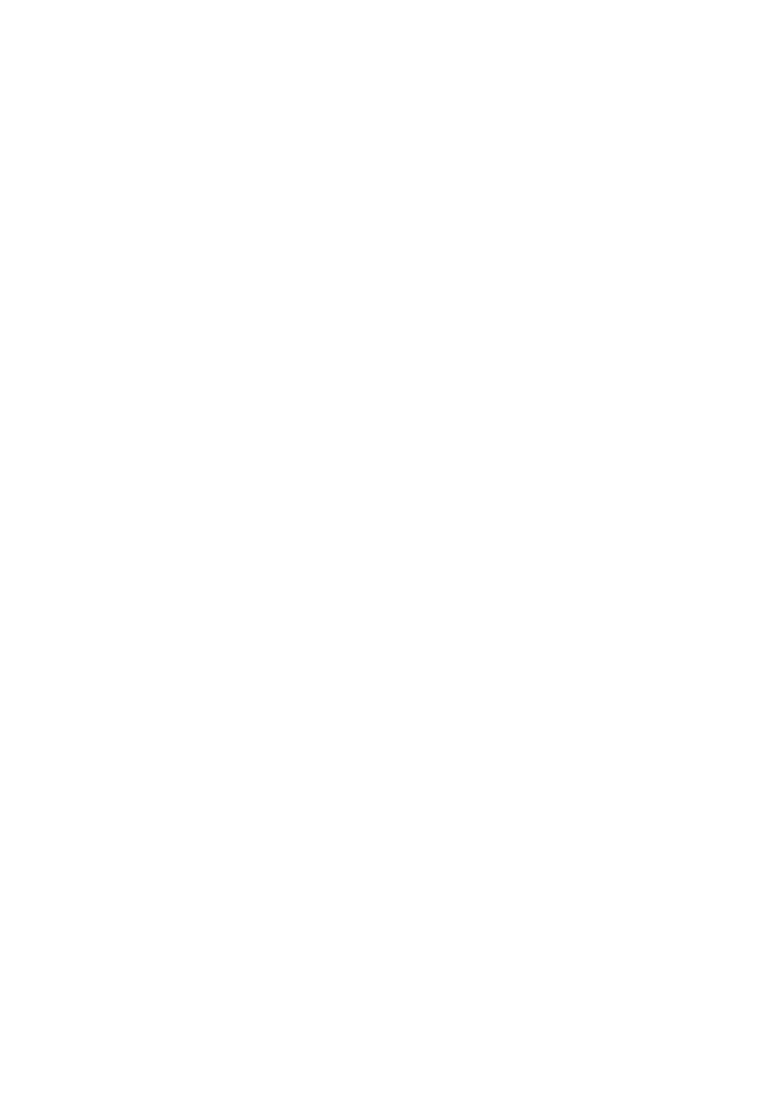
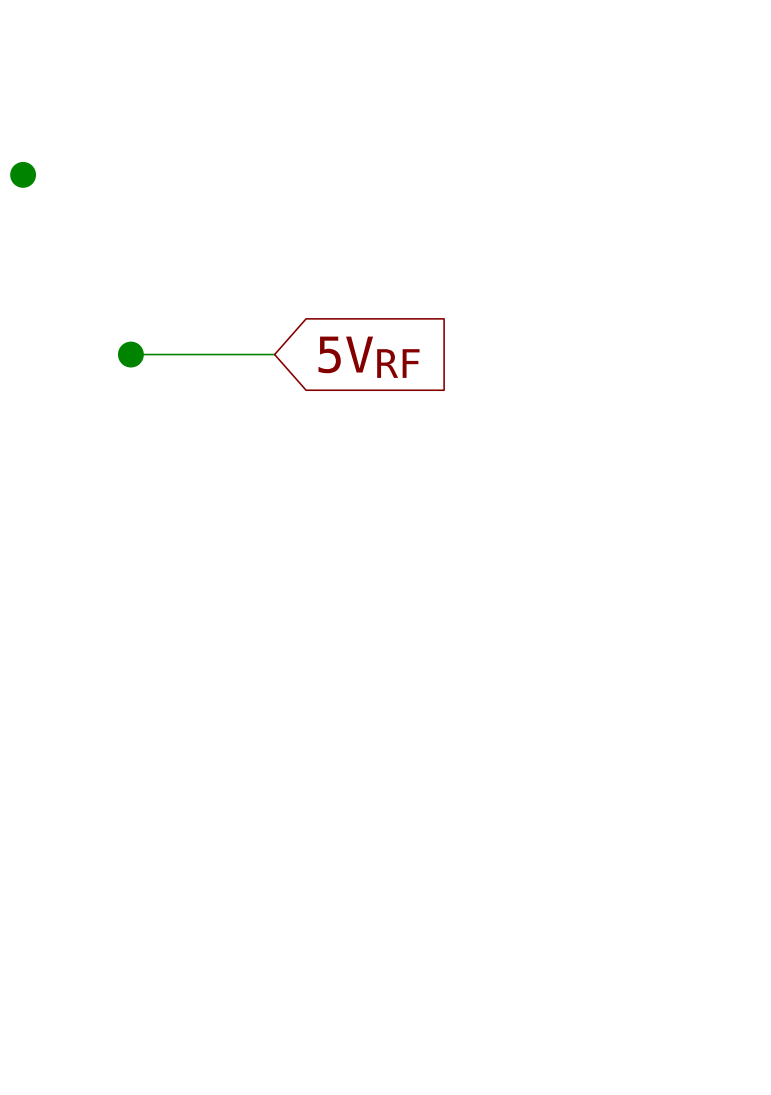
junction: none -> (23, 174)
wire: none -> (130, 354) (274, 354)
junction: none -> (130, 354)
global label: none -> 5VRF (369, 357)

